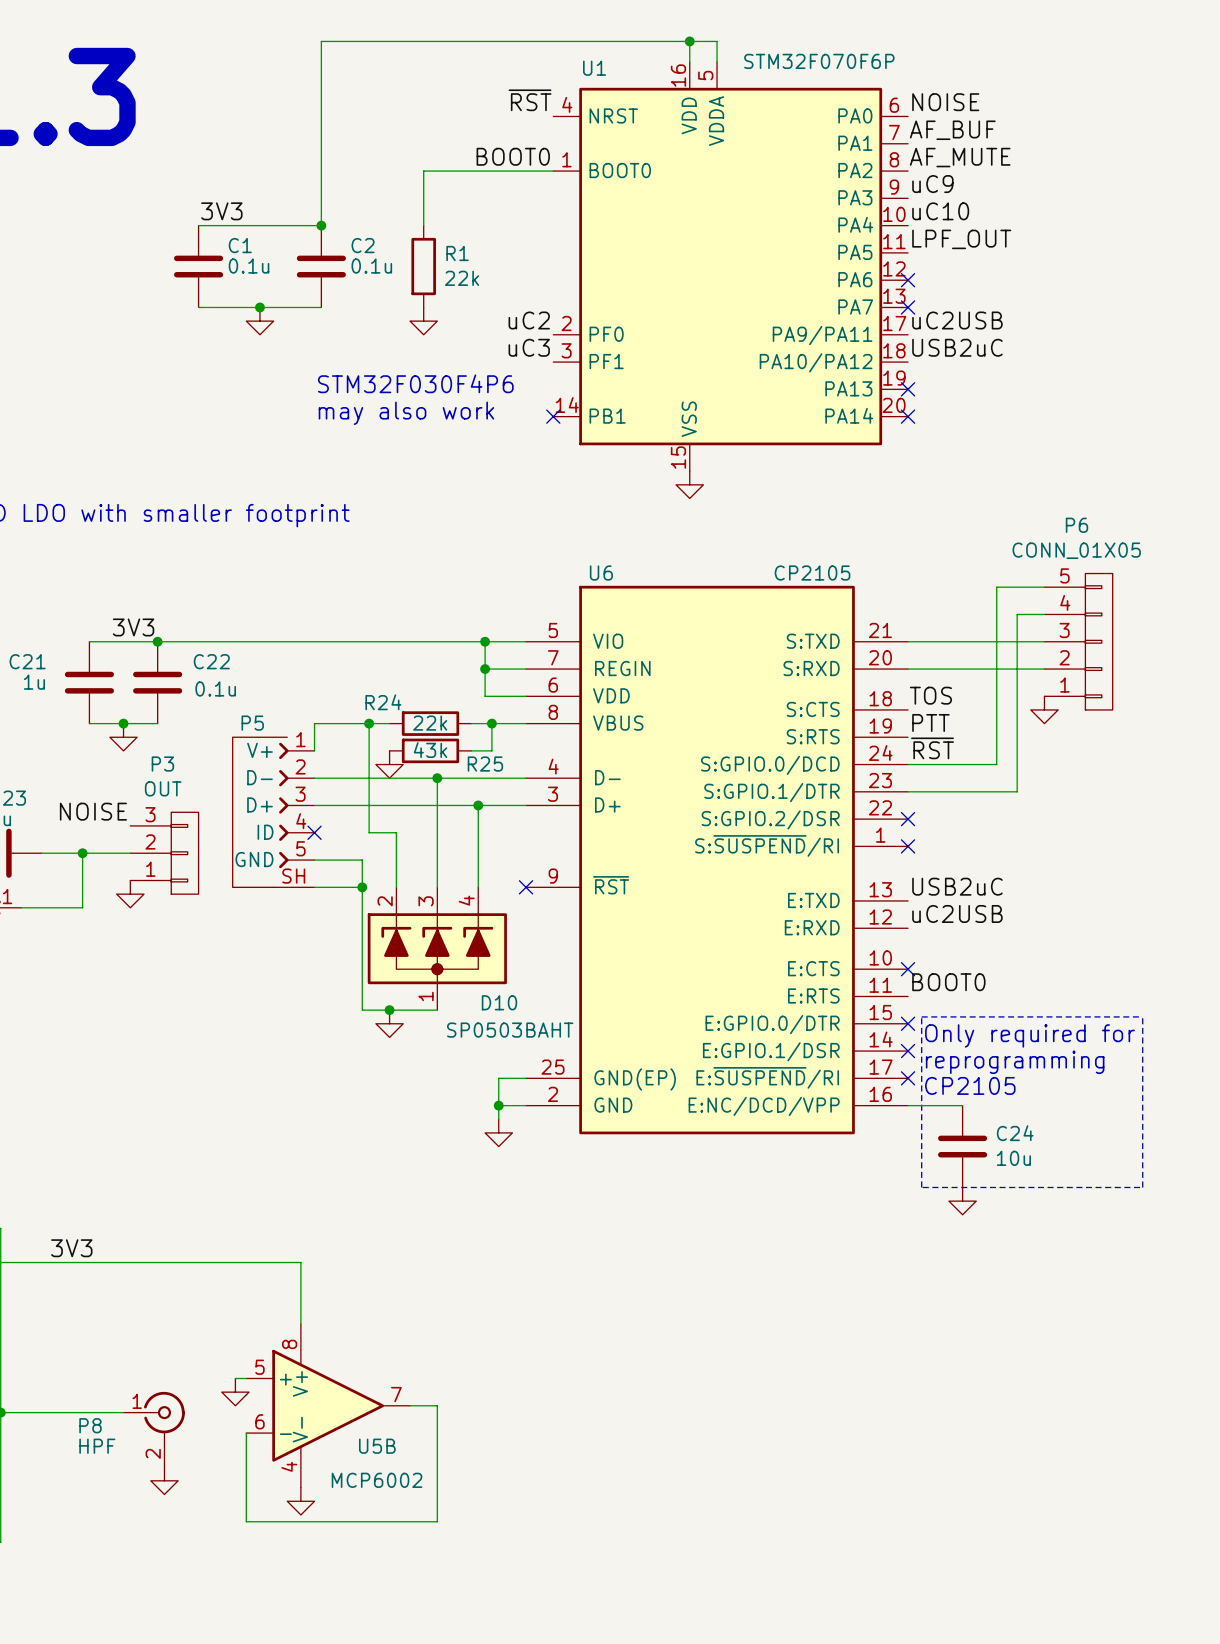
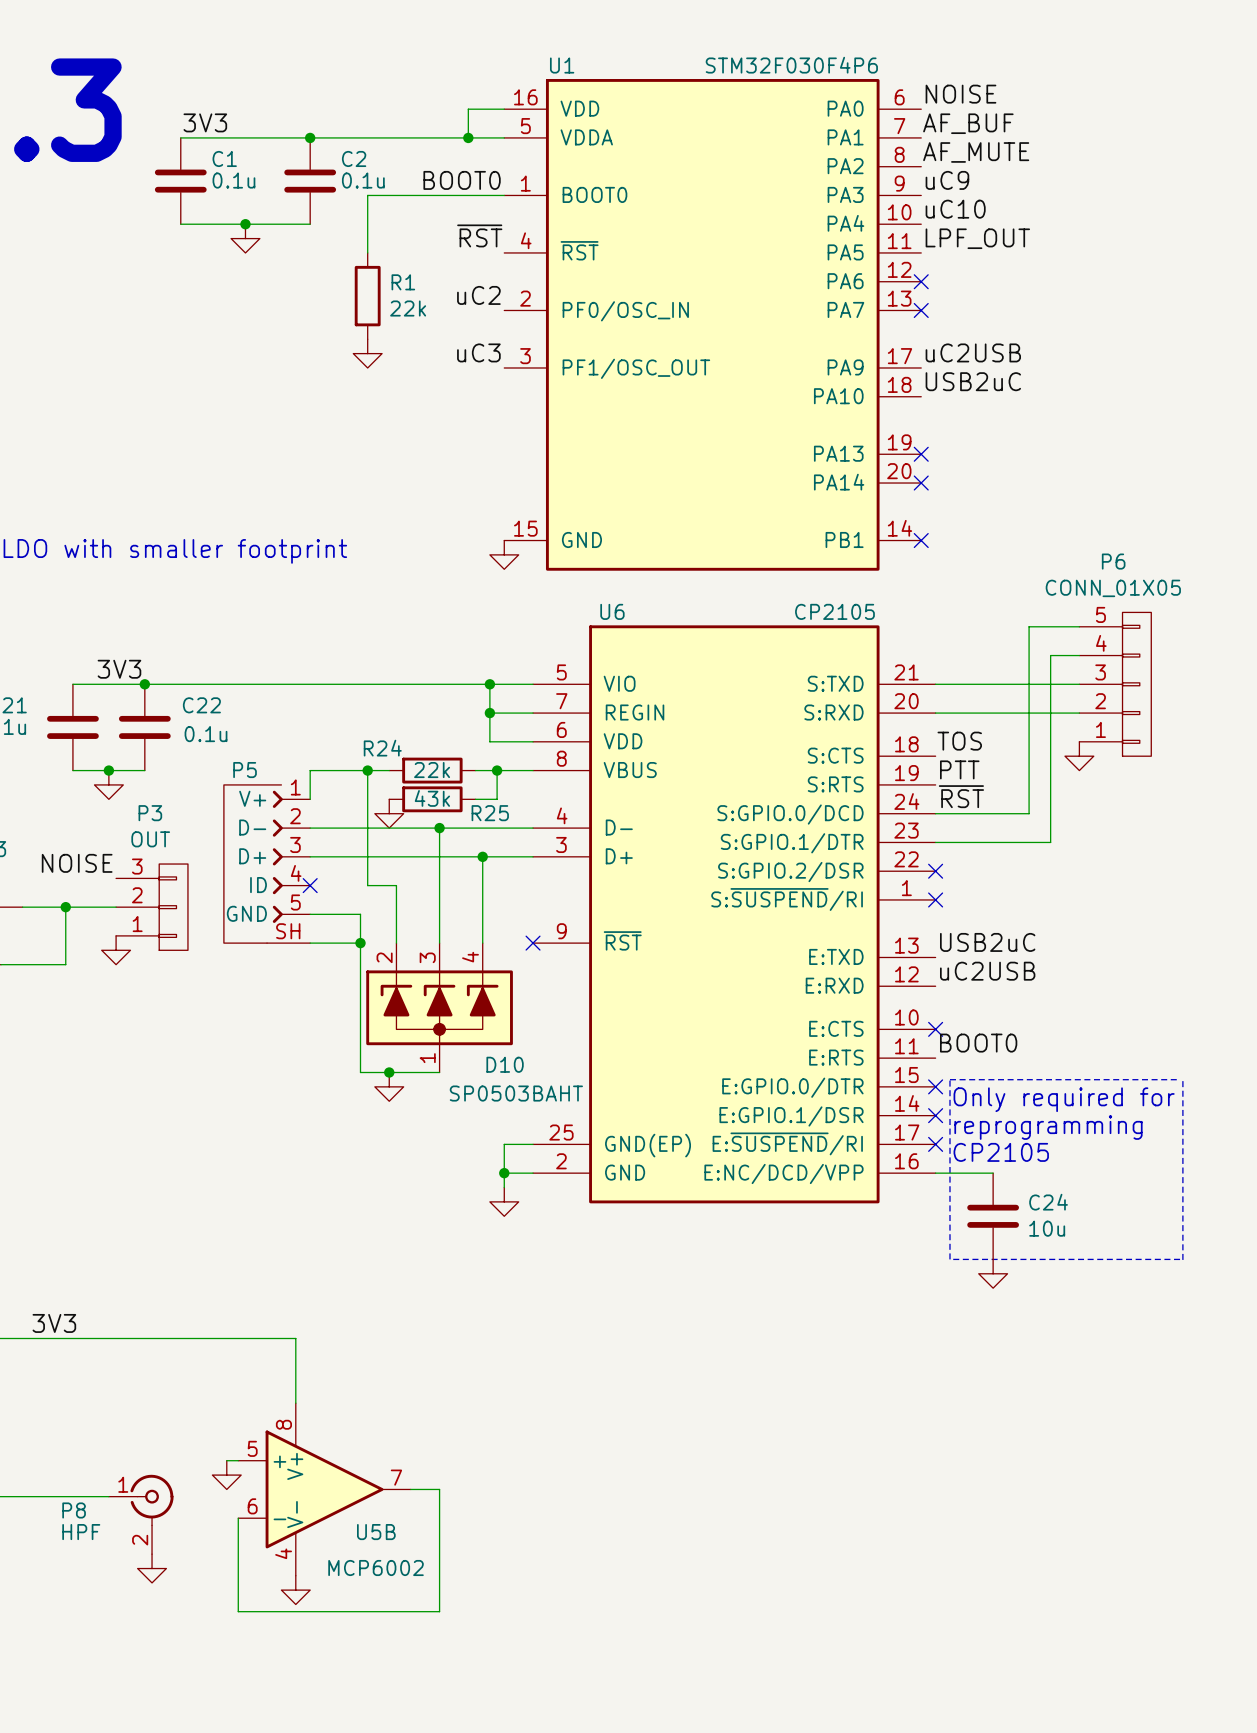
wire: (689, 41) (689, 61) -> none
junction: (689, 41) -> none
U1 symbol: [553, 61, 909, 472] -> [504, 79, 922, 571]
wire: (717, 61) (717, 41) (321, 41) (321, 225) (198, 225) -> none
U1 value: STM32F070F6P (819, 61) -> STM32F030F4P6 (791, 65)
U1 name position: U1 (594, 68) -> U1 (562, 65)
wire: none -> (504, 109) (468, 109) (468, 137)
label position: ~{RST} (530, 100) -> ~{RST} (479, 235)
label position: NOISE (945, 102) -> NOISE (960, 94)
wire: none -> (180, 137) (504, 137)
junction: none -> (310, 137)
junction: none -> (468, 137)
label position: AF_BUF (952, 130) -> AF_BUF (968, 123)
label position: BOOT0 (513, 156) -> BOOT0 (462, 180)
label position: AF_MUTE (960, 157) -> AF_MUTE (976, 152)
wire: (553, 171) (423, 171) (423, 225) -> (504, 195) (367, 195) (367, 252)
label position: uC9 (932, 184) -> uC9 (947, 180)
junction: none -> (245, 224)
label position: 3V3 (221, 211) -> 3V3 (205, 122)
label position: uC10 (940, 211) -> uC10 (955, 209)
power symbol: none -> (245, 238)
junction: (321, 225) -> none
label position: LPF_OUT (961, 239) -> LPF_OUT (977, 238)
no-connect mark: none -> (921, 281)
C1 position: (198, 266) -> (180, 181)
C2 position: (321, 266) -> (310, 181)
R1 position: (423, 266) -> (367, 296)
no-connect mark: (908, 280) -> none
no-connect mark: none -> (921, 310)
wire: (198, 307) (321, 307) -> (180, 224) (310, 224)
junction: (259, 307) -> none
no-connect mark: (908, 307) -> none
label position: uC2 (529, 320) -> uC2 (478, 295)
label position: uC2USB (957, 320) -> uC2USB (973, 352)
power symbol: (259, 321) -> none
power symbol: (423, 321) -> none
power symbol: none -> (367, 353)
label position: uC3 (529, 347) -> uC3 (478, 352)
label position: USB2uC (957, 347) -> USB2uC (973, 381)
text: STM32F030F4P6 (415, 383) -> none
no-connect mark: (908, 389) -> none
text: may also work (406, 413) -> none
no-connect mark: (553, 416) -> none
no-connect mark position: (908, 416) -> (921, 454)
no-connect mark: none -> (921, 483)
power symbol: (689, 484) -> none
no-connect mark: none -> (921, 540)
power symbol: none -> (504, 554)

